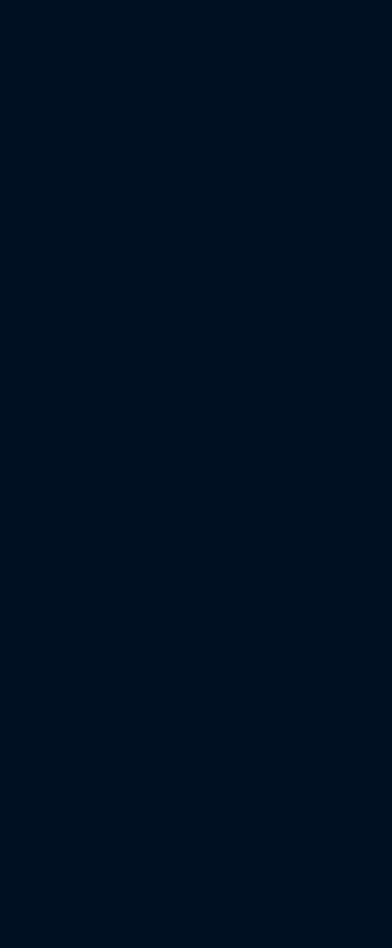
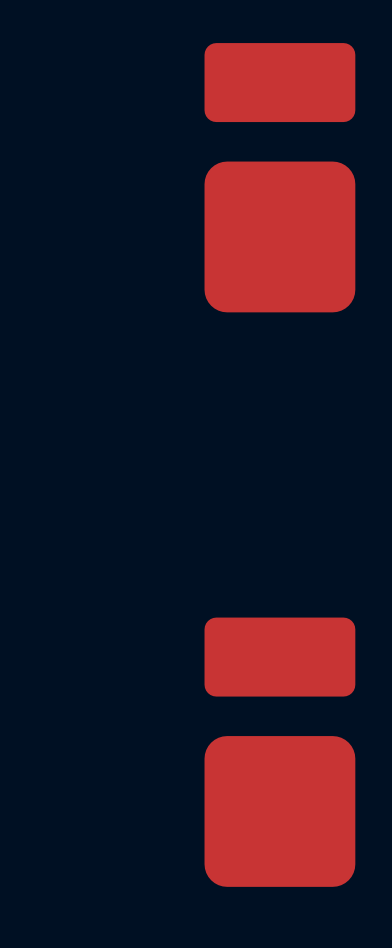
part: none -> (279, 177)
part: none -> (279, 752)

